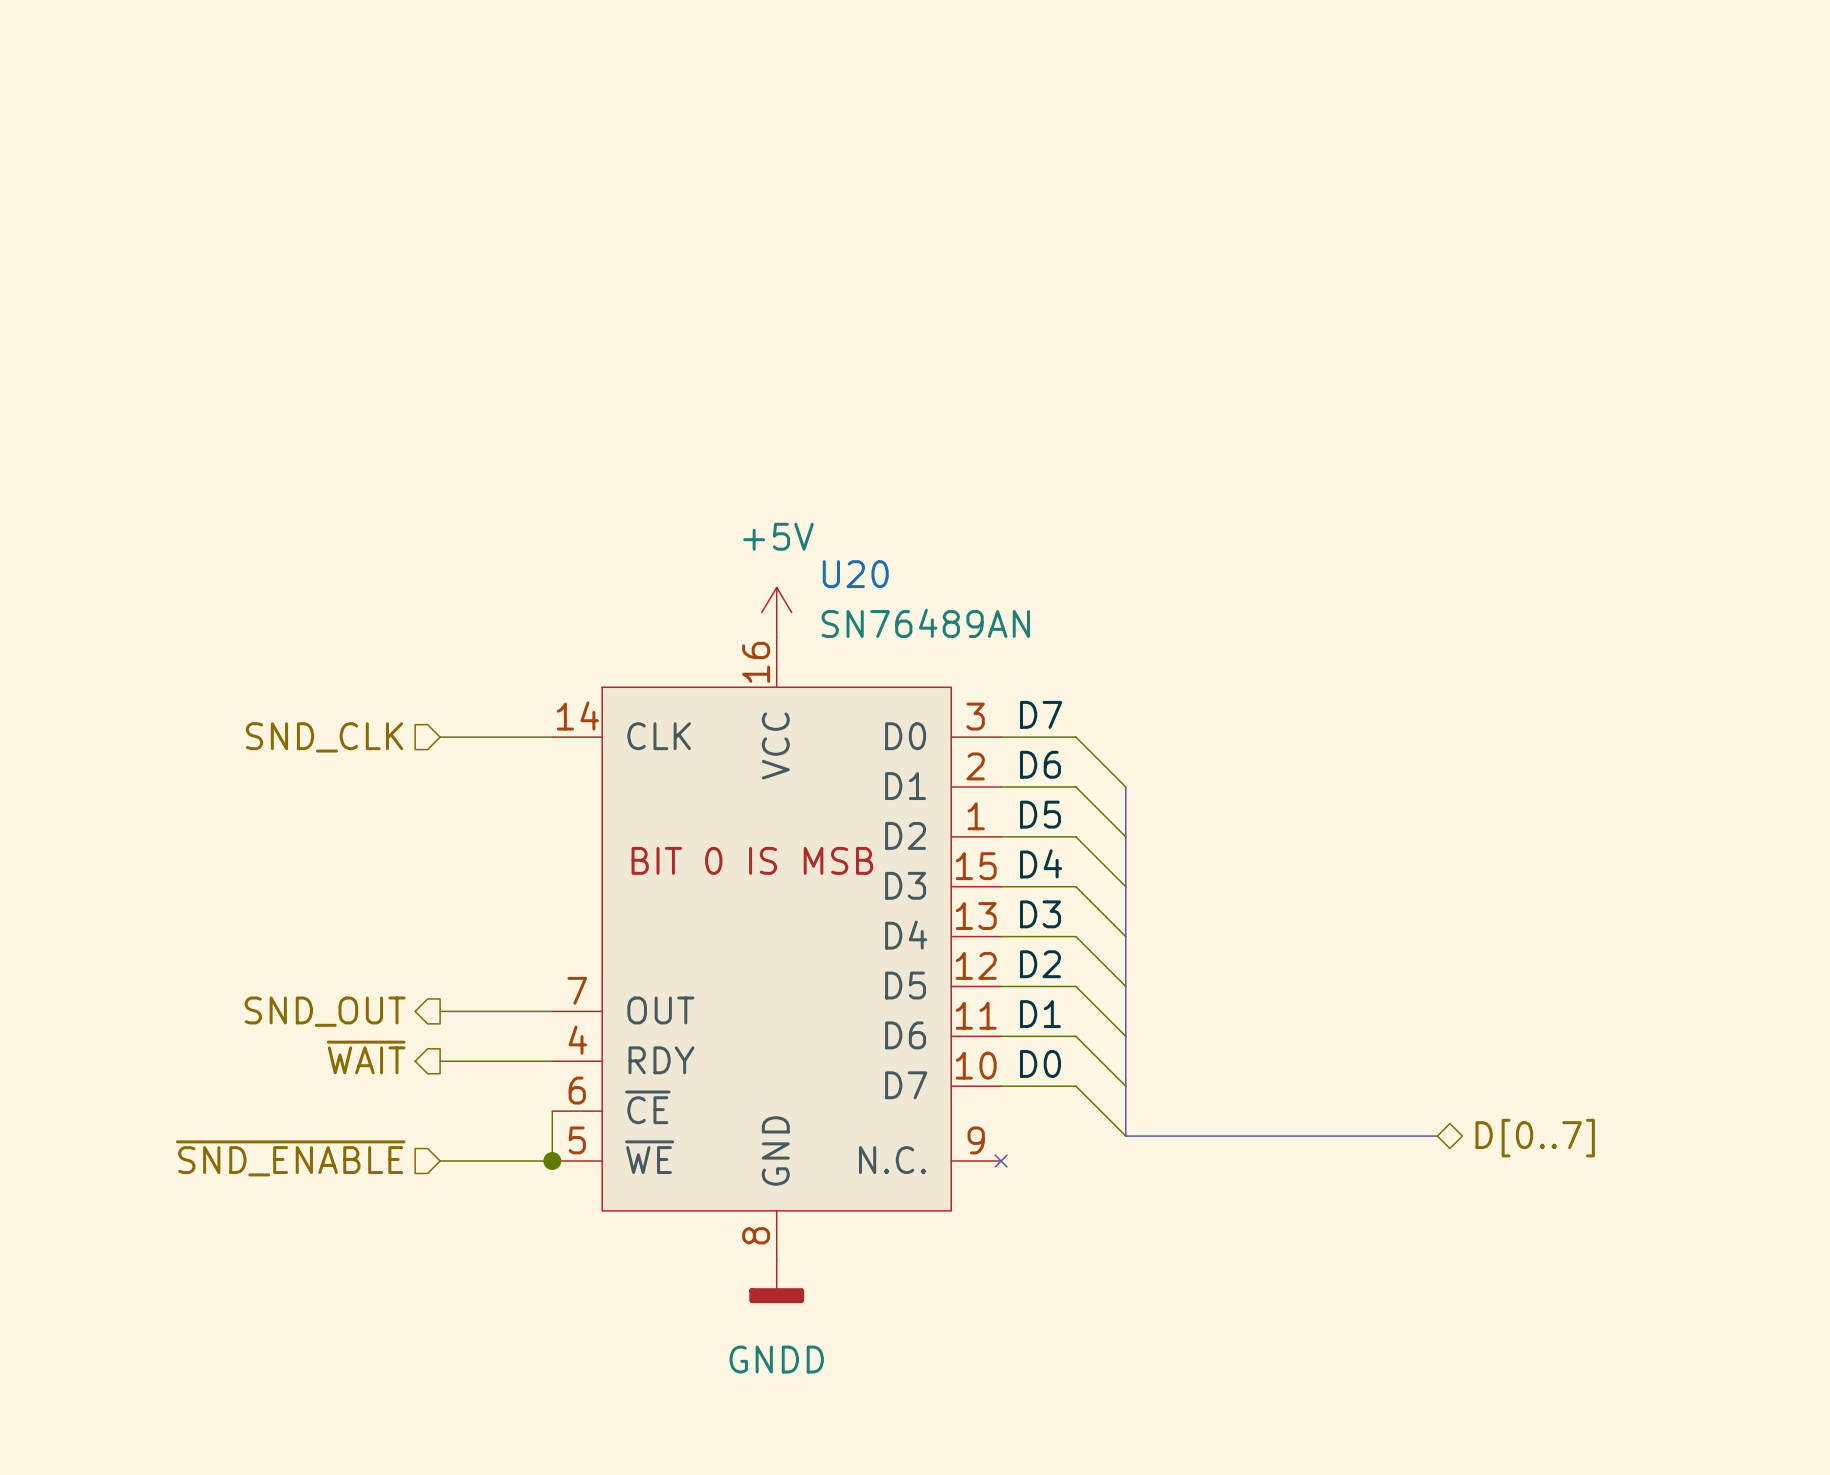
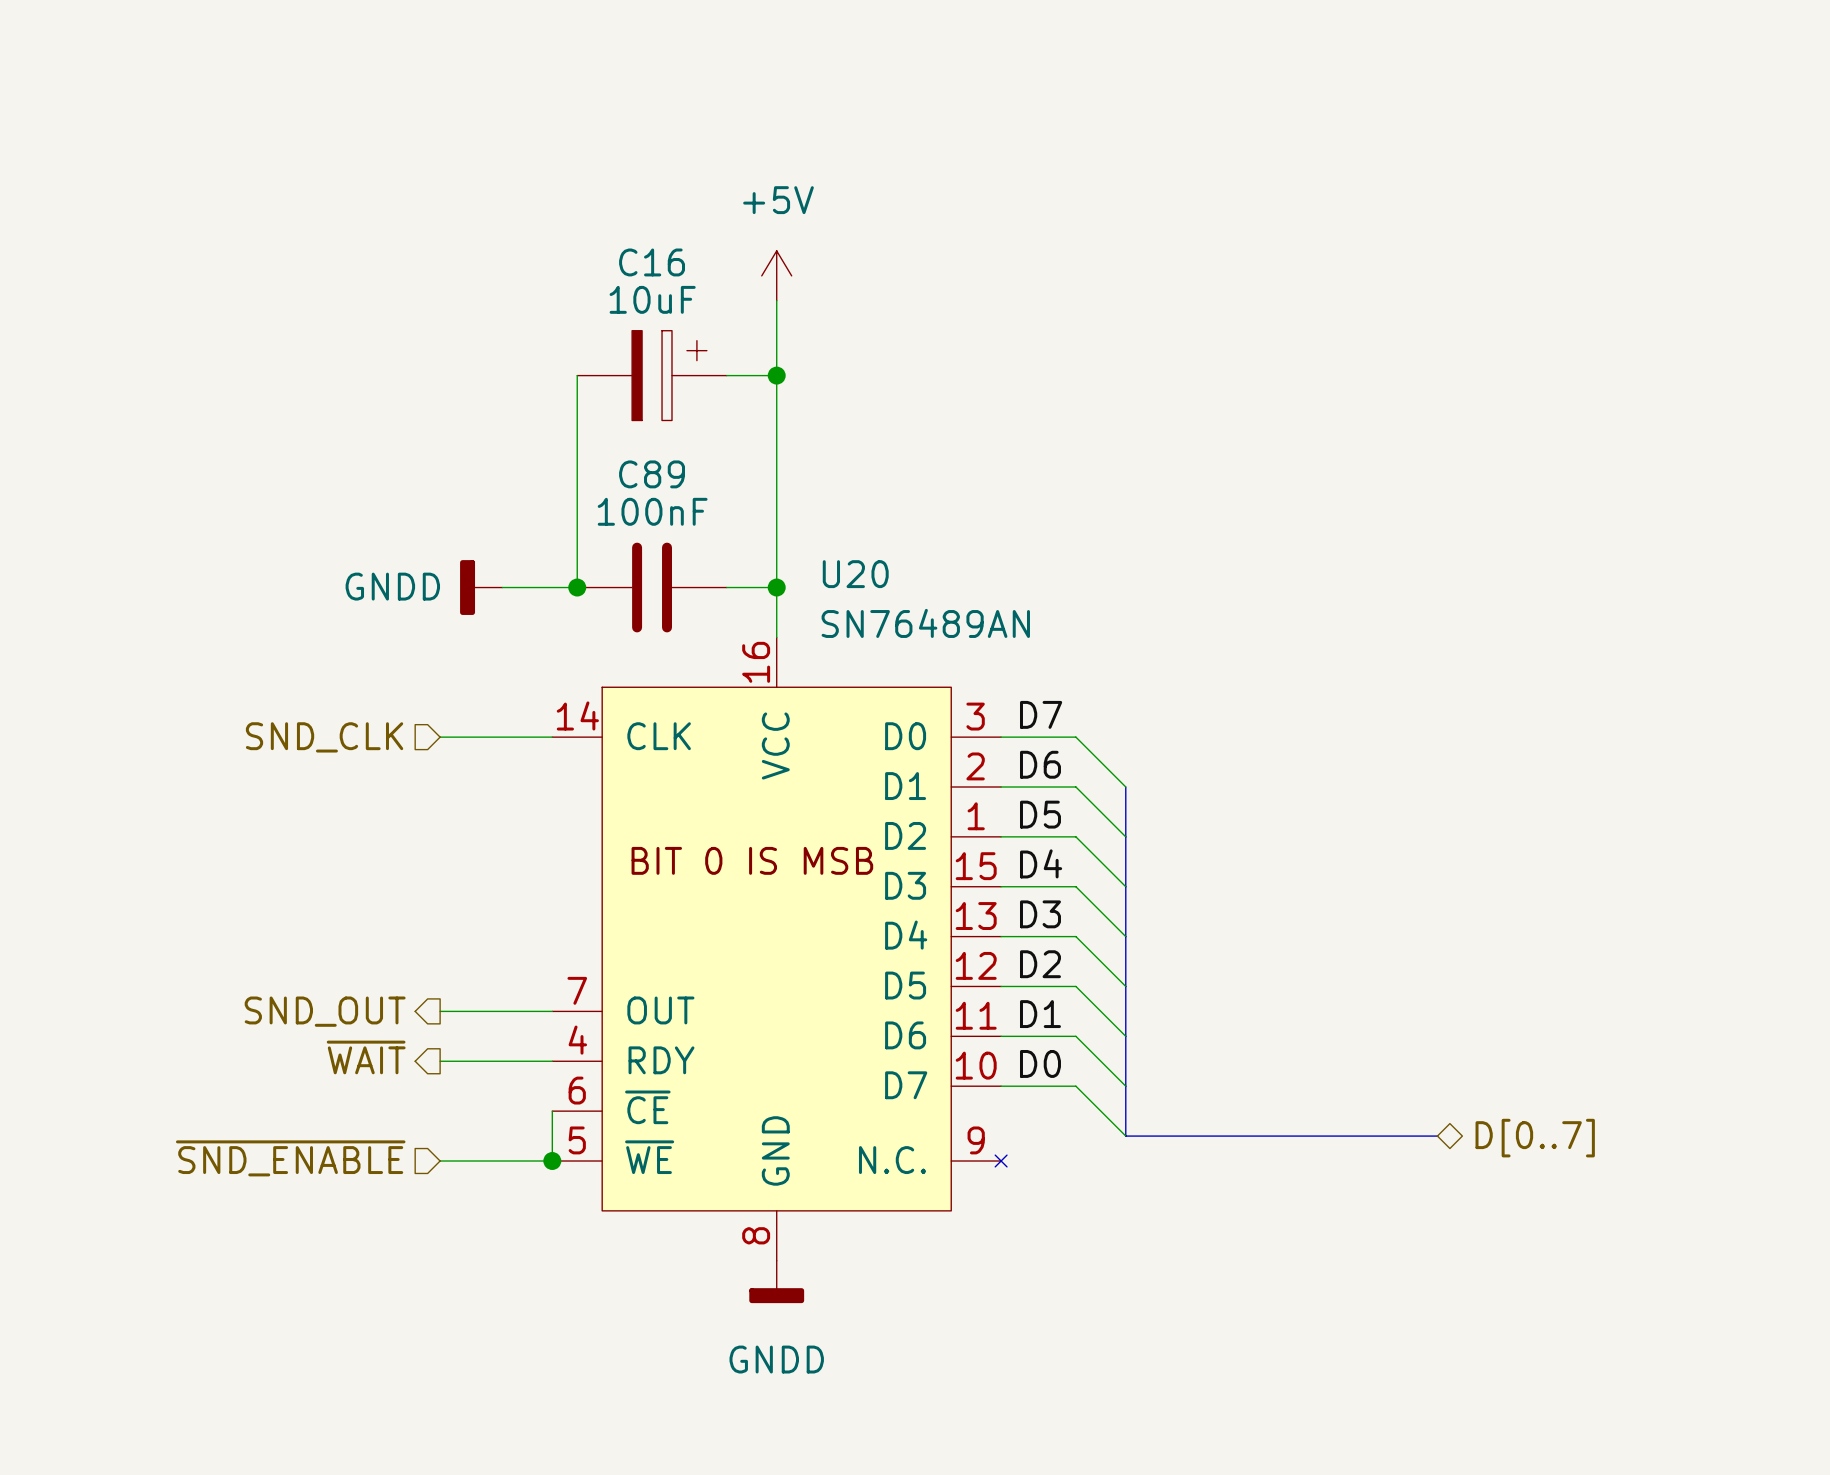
wire: none -> (776, 300) (776, 637)
wire: none -> (577, 375) (577, 587) (502, 587)
C16: none -> 10uF (652, 375)
wire: none -> (726, 375) (776, 375)
junction: none -> (776, 375)
power symbol: none -> GNDD (481, 587)
junction: none -> (577, 587)
C89: none -> 100nF (652, 587)
wire: none -> (726, 587) (776, 587)
junction: none -> (776, 587)
power symbol position: +5V (776, 612) -> +5V (776, 275)

